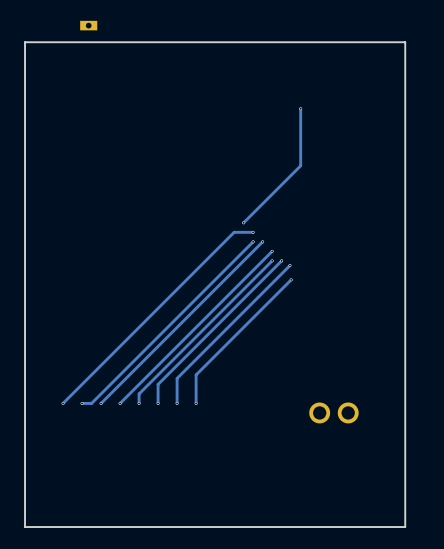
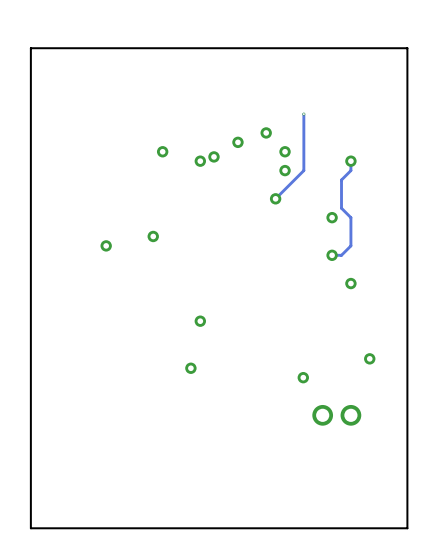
part: (88, 25) -> none
via: none -> (266, 132)
via: none -> (237, 142)
via: none -> (162, 151)
via: none -> (285, 151)
via: none -> (213, 156)
via: none -> (200, 161)
track: none -> (350, 161) (350, 170) (341, 180) (341, 208) (350, 217) (350, 245) (341, 255) (332, 255)
via: none -> (350, 161)
via: none -> (285, 170)
track: (272, 194) (243, 222) -> none
via: none -> (275, 198)
via: none -> (332, 217)
via: (243, 222) -> none
via: none -> (153, 236)
track: (253, 232) (234, 232) (63, 403) -> none
via: (253, 232) -> none
via: none -> (106, 245)
track: (253, 241) (91, 403) (82, 403) -> none
via: (253, 241) -> none
track: (262, 241) (101, 403) -> none
via: (262, 241) -> none
track: (272, 251) (120, 403) -> none
via: (272, 251) -> none
via: none -> (332, 255)
track: (272, 260) (139, 393) (139, 403) -> none
via: (272, 260) -> none
track: (281, 260) (158, 384) (158, 403) -> none
via: (281, 260) -> none
track: (289, 265) (177, 378) (177, 403) -> none
via: (289, 265) -> none
track: (291, 279) (196, 374) (196, 403) -> none
via: (291, 279) -> none
via: none -> (350, 283)
via: none -> (200, 321)
via: none -> (369, 358)
via: none -> (190, 368)
via: none -> (303, 377)
via: (63, 403) -> none
via: (82, 403) -> none
via: (101, 403) -> none
via: (120, 403) -> none
via: (139, 403) -> none
via: (158, 403) -> none
via: (177, 403) -> none
via: (196, 403) -> none

